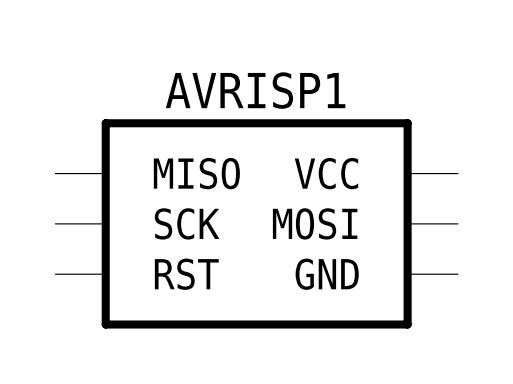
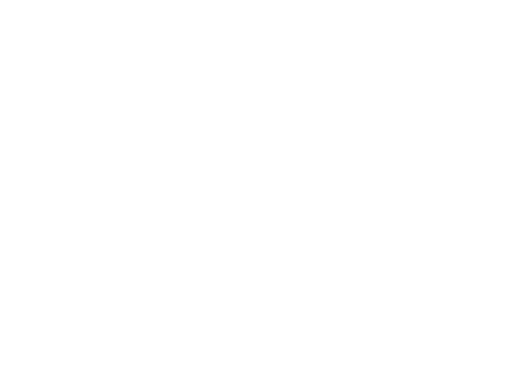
AVRISP1: (256, 223) -> none

